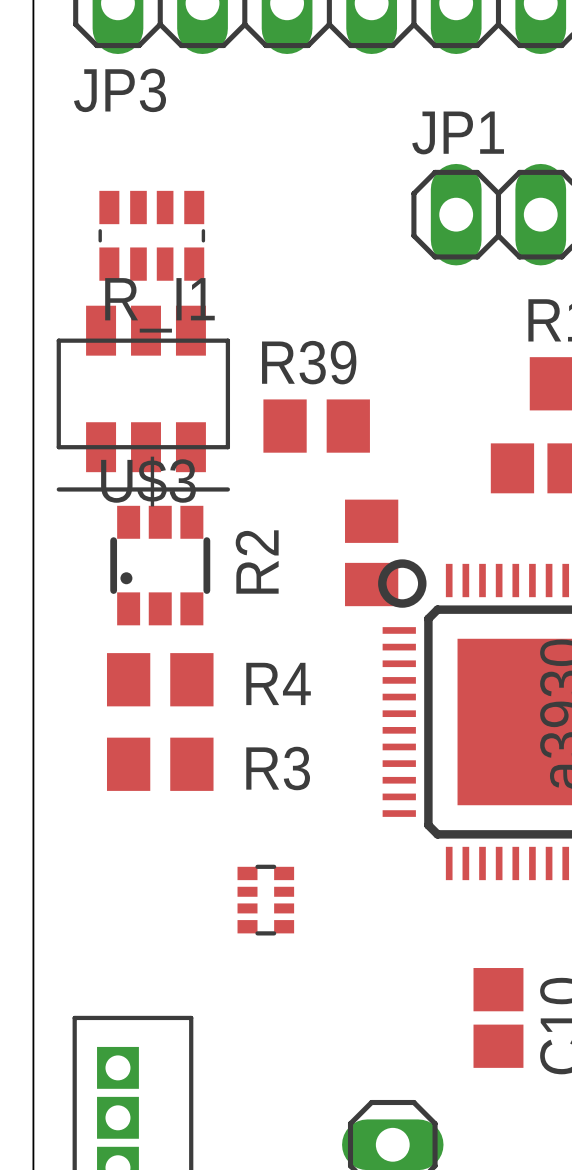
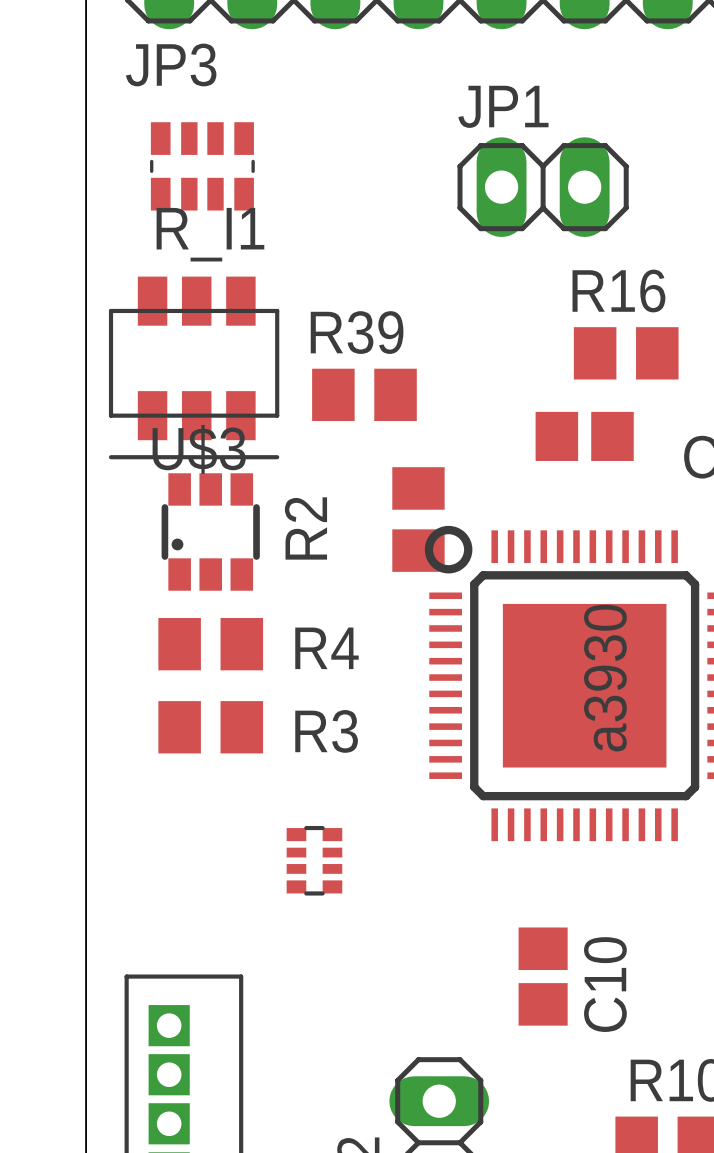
R_I1 position: (151, 235) -> (202, 166)

